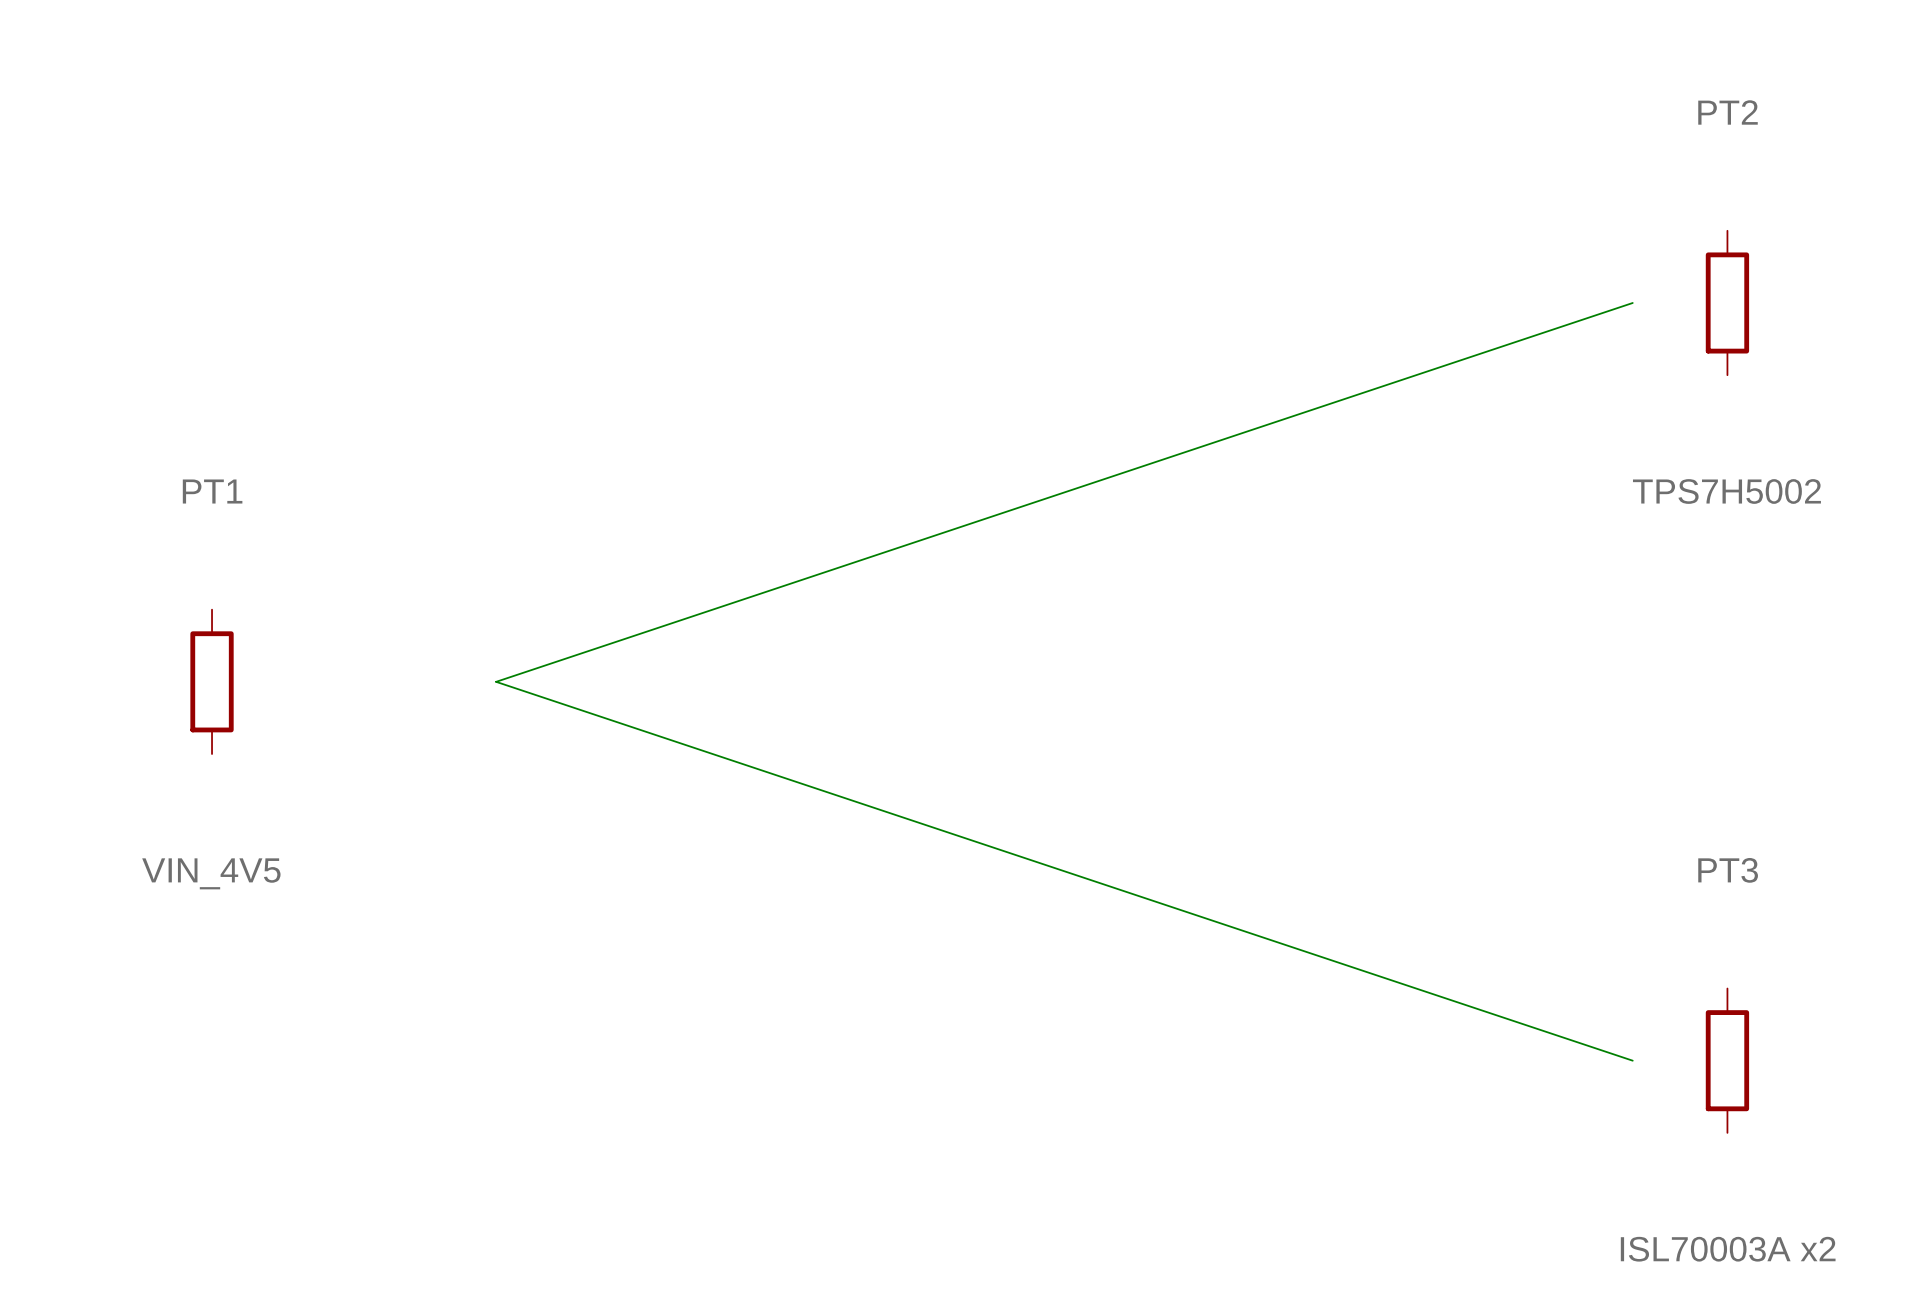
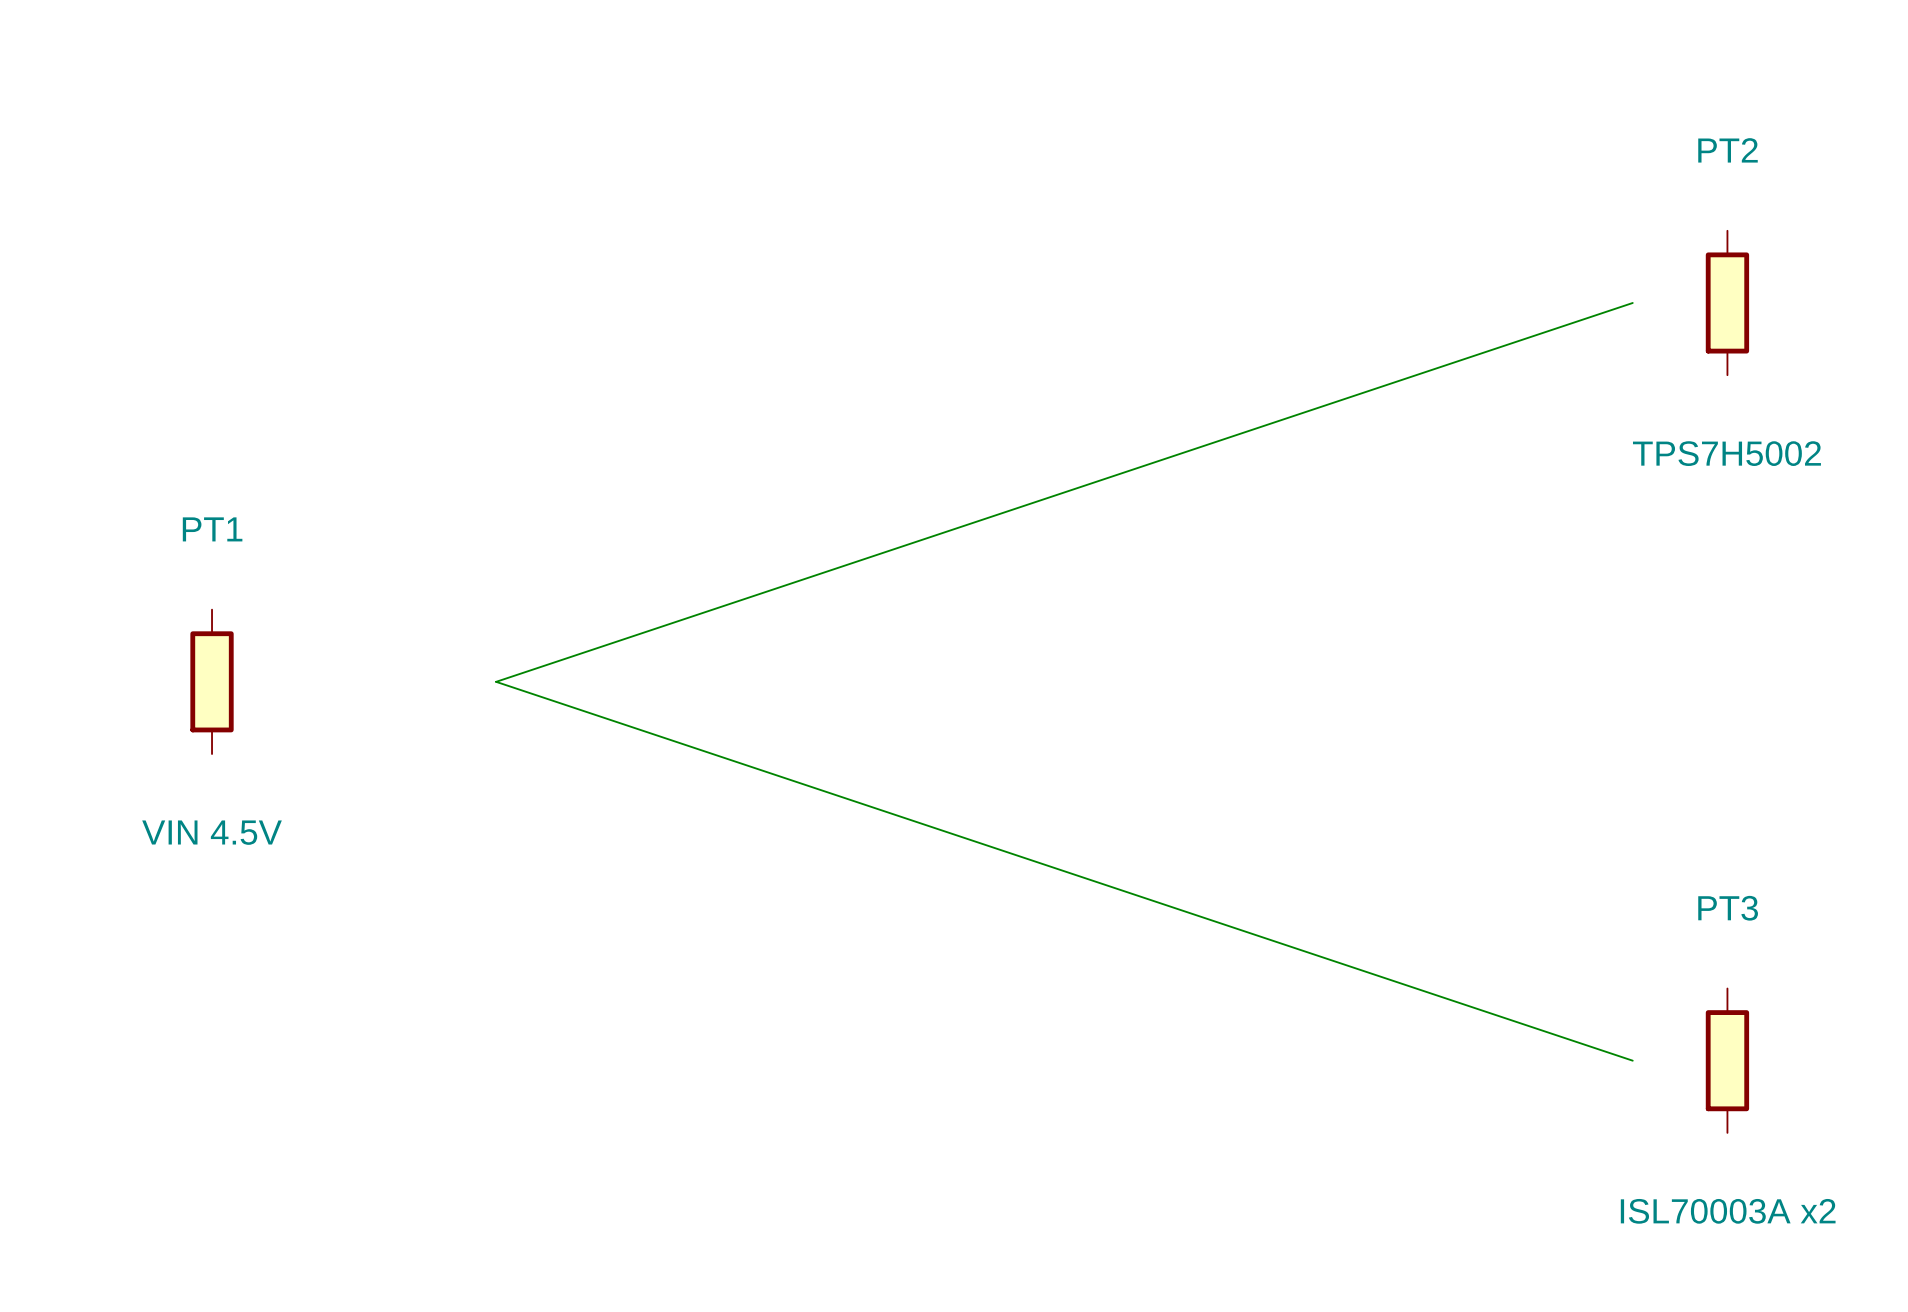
PT2 name position: PT2 (1728, 112) -> PT2 (1728, 150)
PT1 name position: PT1 (212, 491) -> PT1 (212, 529)
PT2 value position: TPS7H5002 (1726, 491) -> TPS7H5002 (1726, 453)
PT3 name position: PT3 (1728, 870) -> PT3 (1728, 908)
PT1 value: VIN_4V5 (211, 873) -> VIN 4.5V (212, 832)
PT3 value position: ISL70003A x2 (1728, 1249) -> ISL70003A x2 (1728, 1211)

